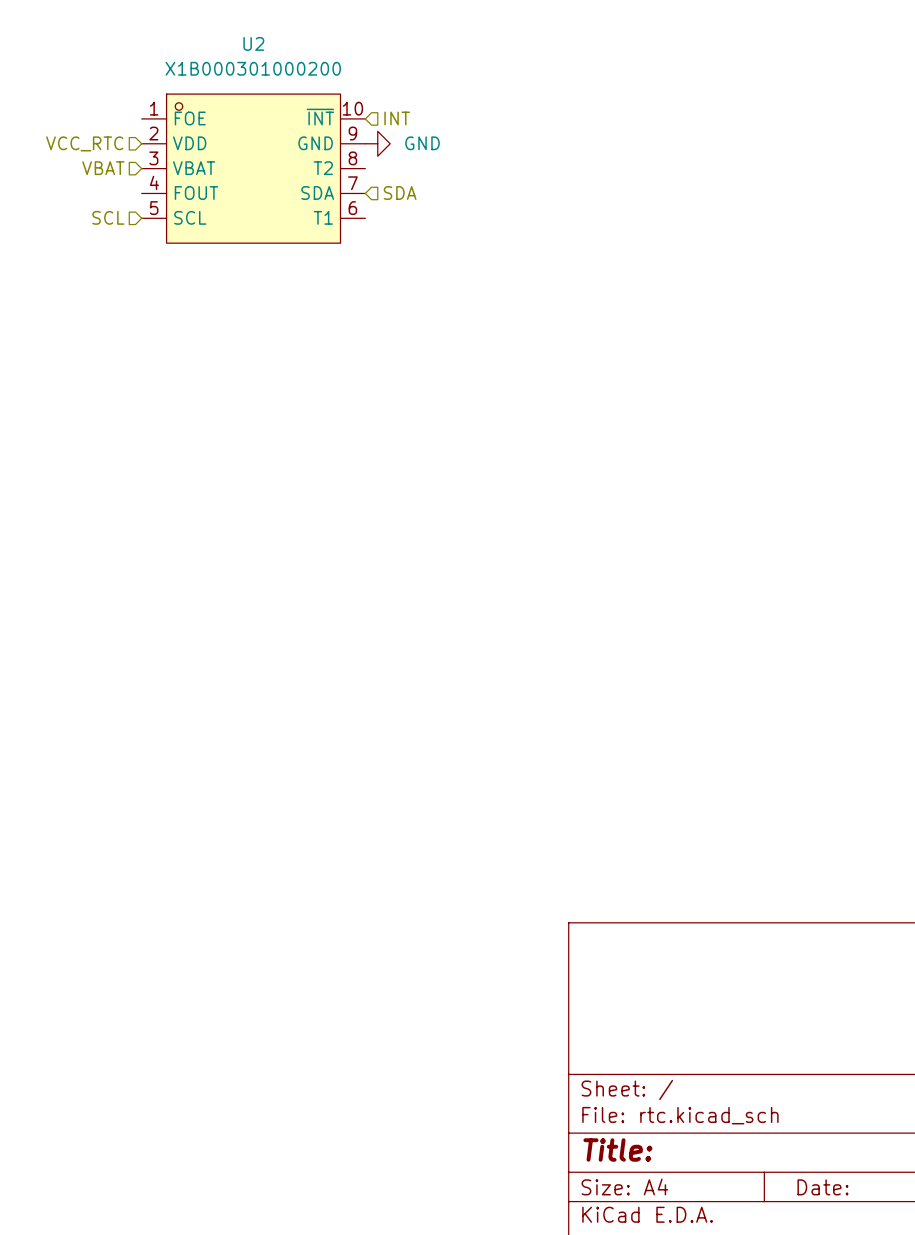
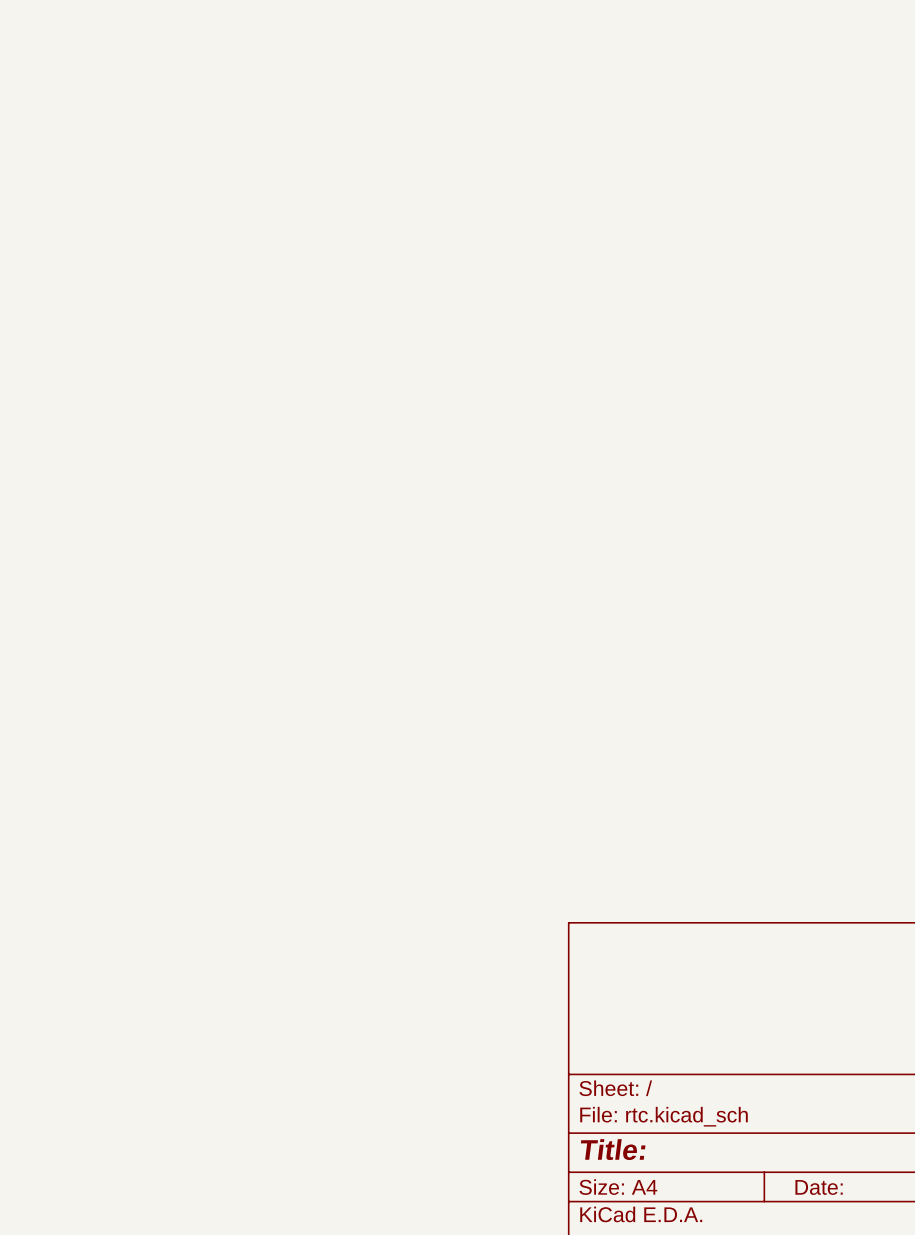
hierarchical label: INT (397, 118) -> none
hierarchical label: VCC_RTC (84, 143) -> none
power symbol: GND (377, 143) -> none
hierarchical label: VBAT (103, 168) -> none
U2: X1B000301000200 (253, 168) -> none
hierarchical label: SDA (400, 193) -> none
hierarchical label: SCL (108, 217) -> none

